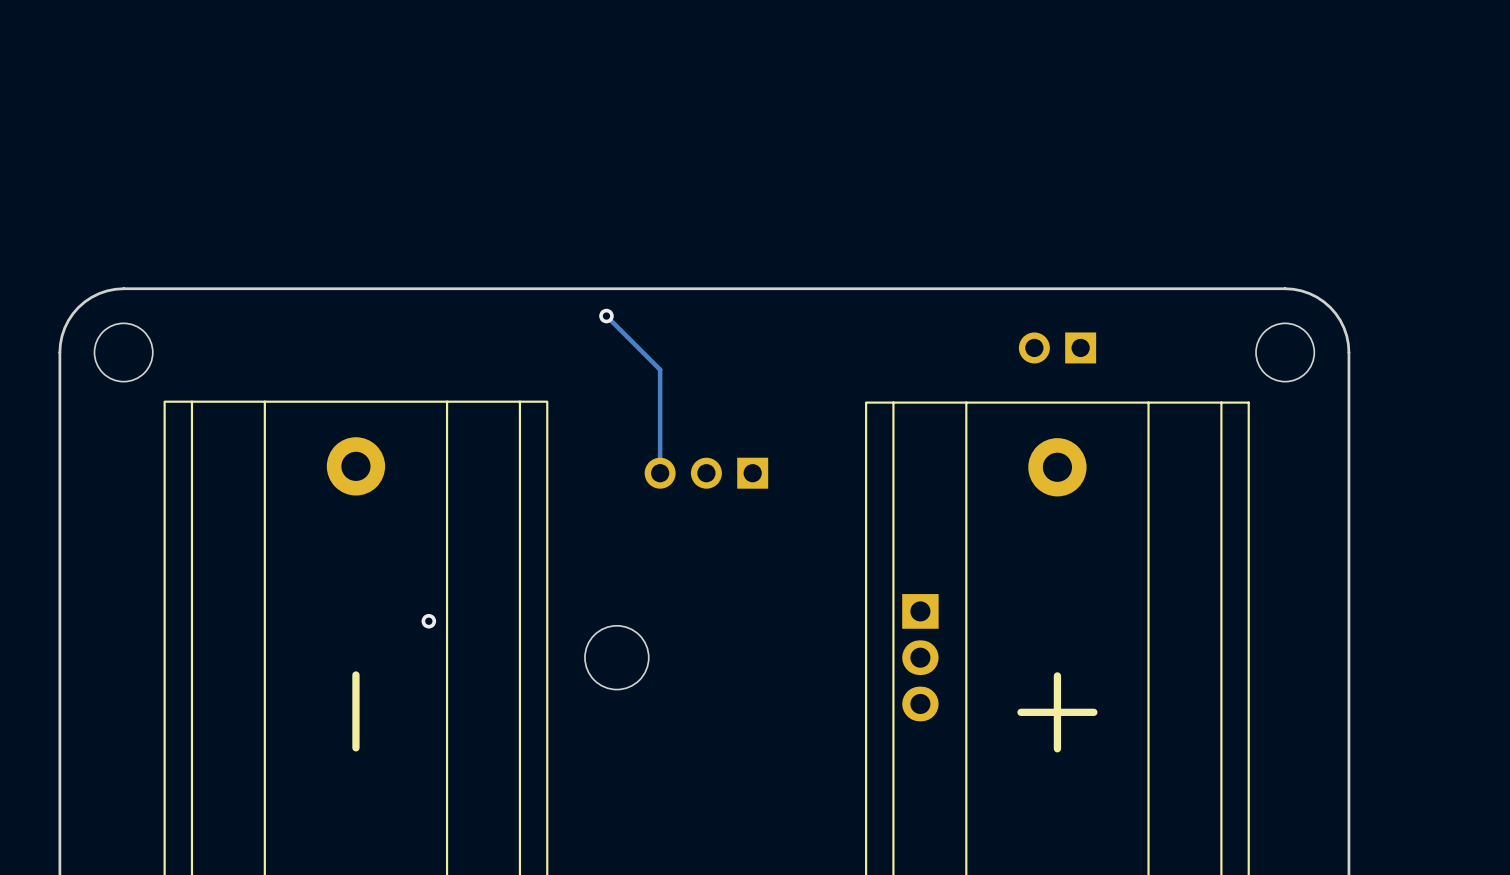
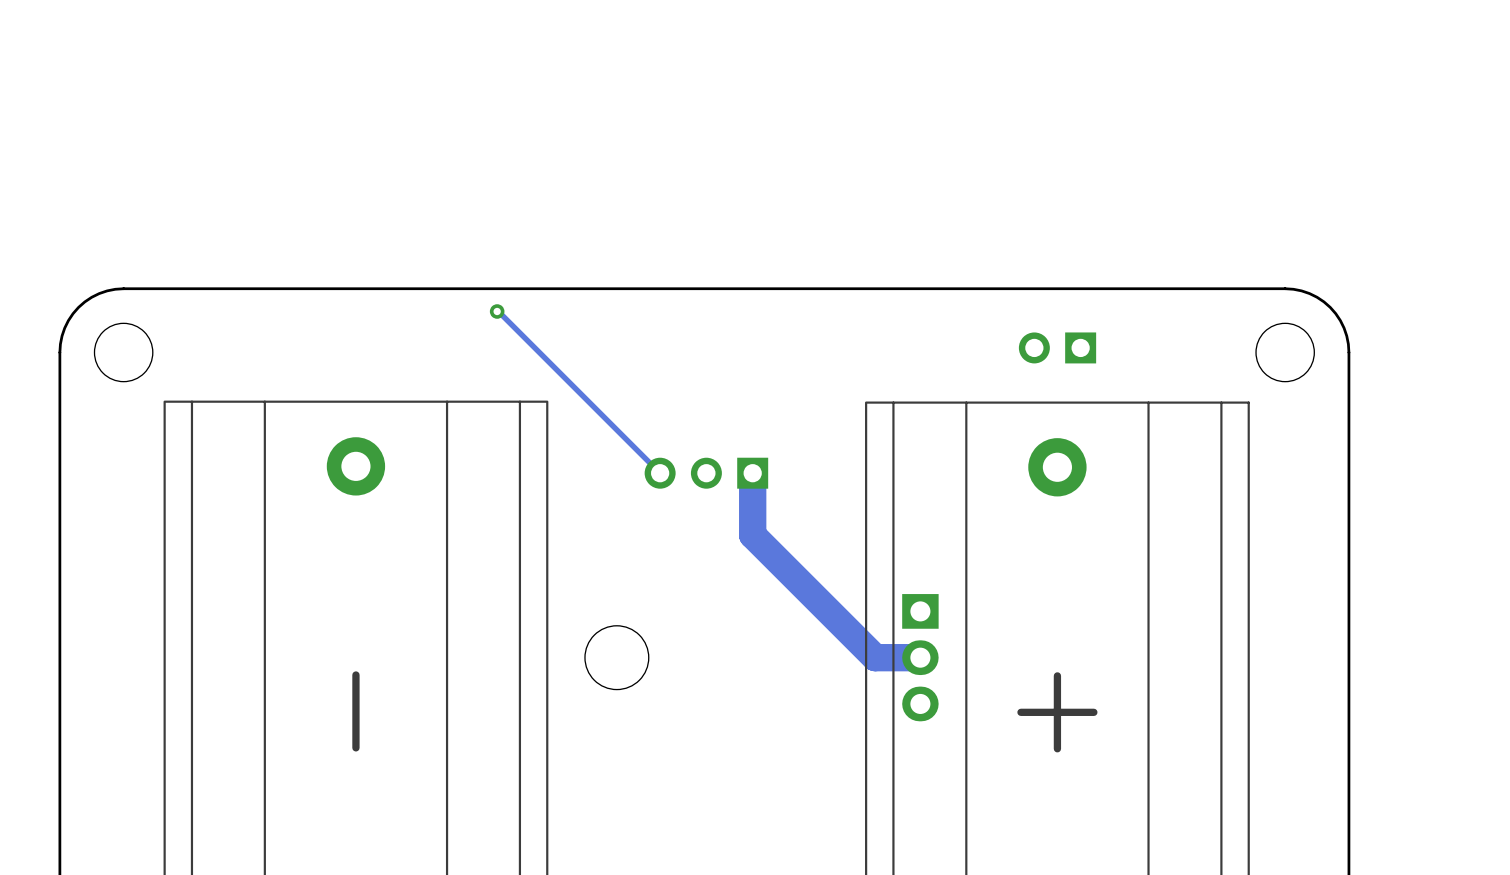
via: none -> (497, 311)
track: (606, 316) (660, 369) (660, 473) -> (497, 311) (660, 473)
via: (606, 316) -> none
track: none -> (752, 473) (752, 535) (875, 657) (920, 657)
via: (428, 621) -> none

